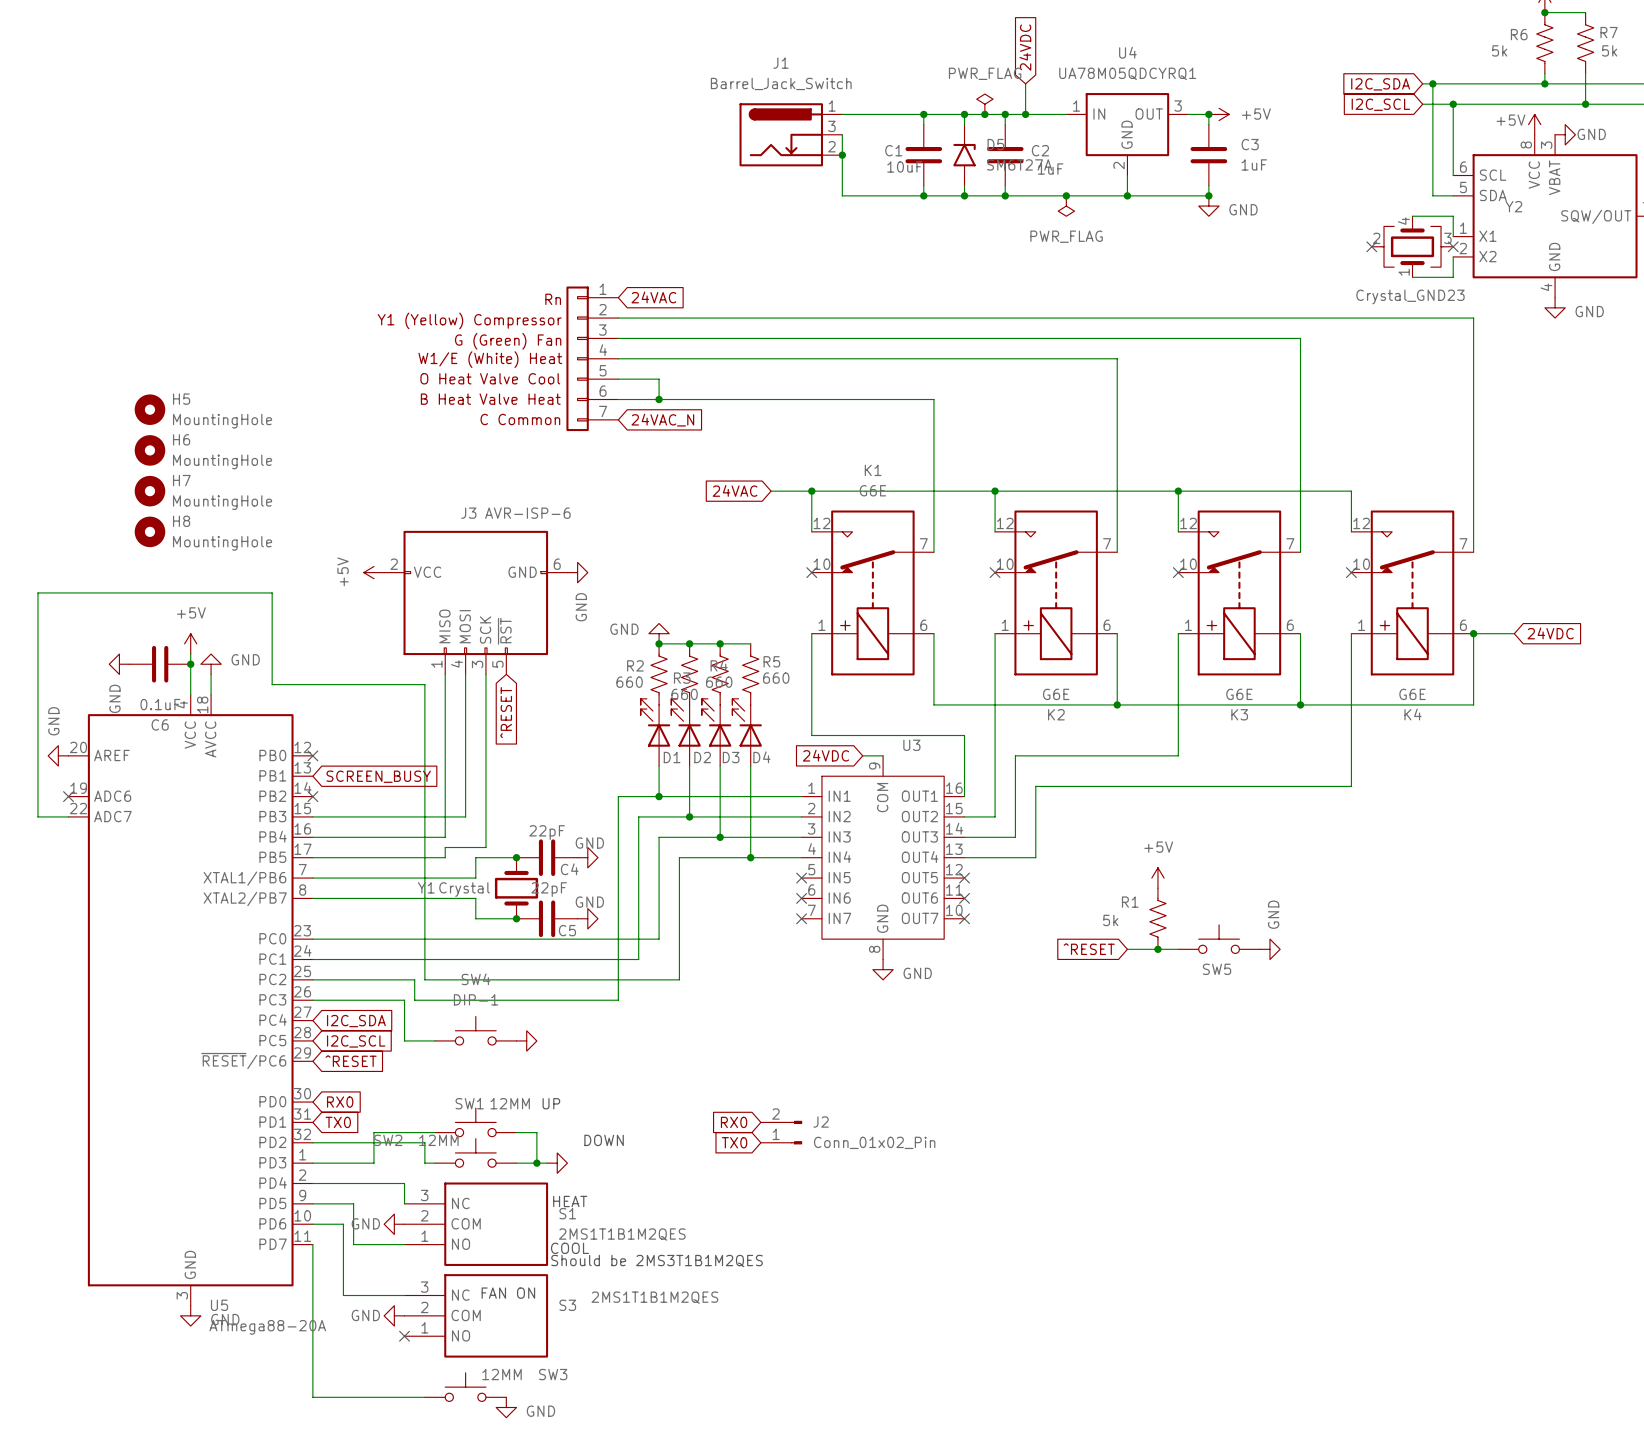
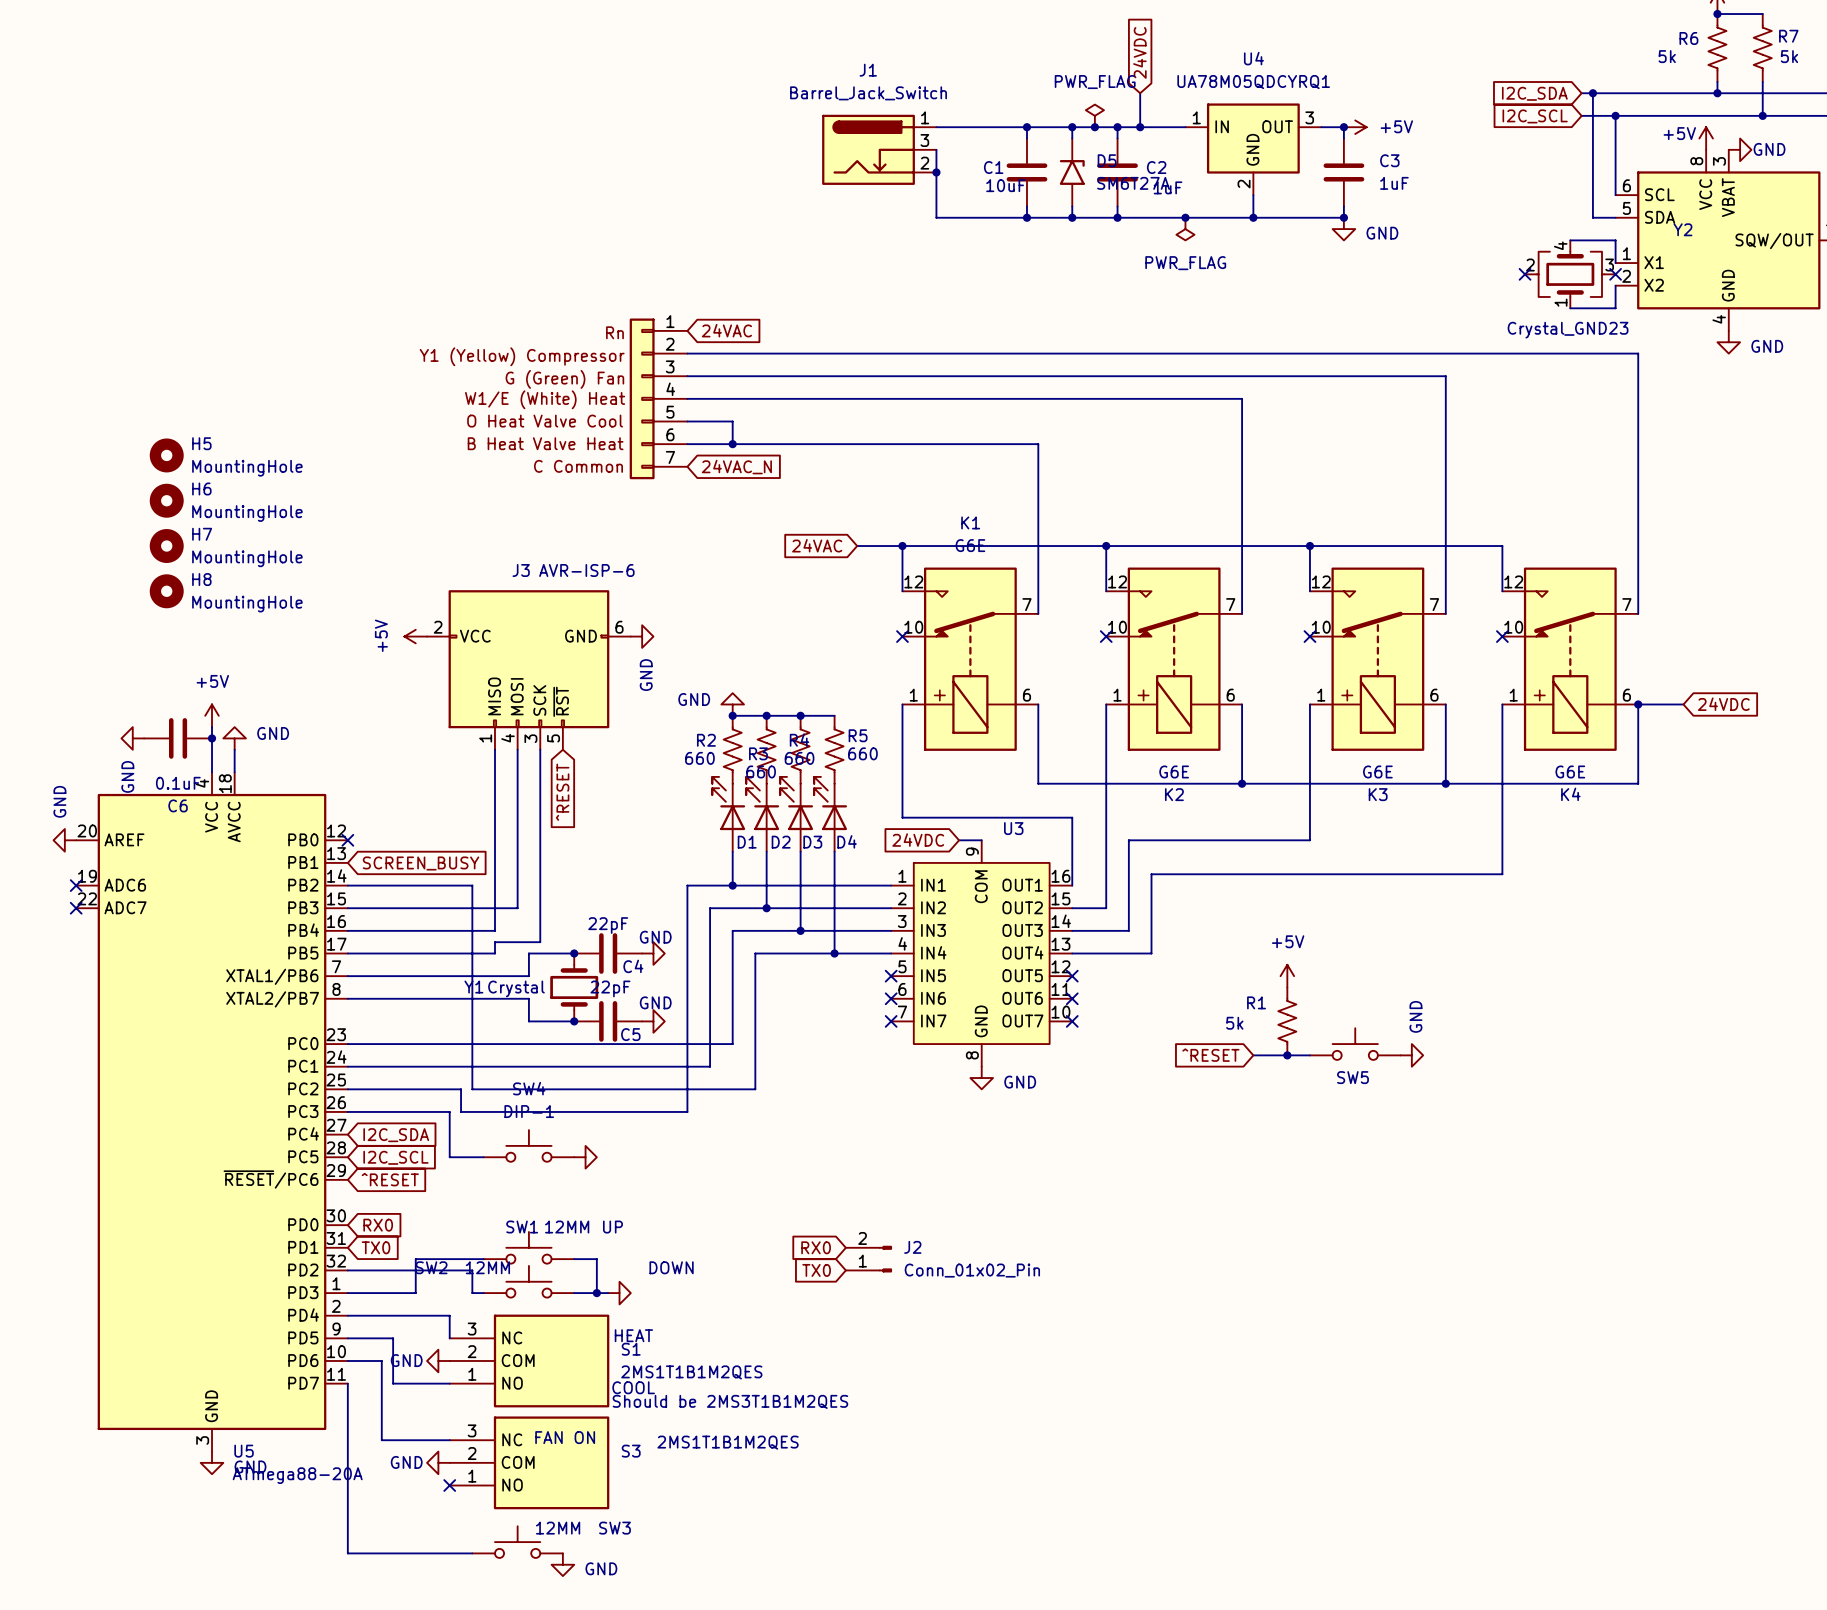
no-connect mark: (312, 796) -> none
wire: (424, 796) (424, 684) (272, 684) (272, 592) (37, 592) (37, 816) (68, 816) -> (472, 885) (347, 885)
no-connect mark: none -> (76, 908)

